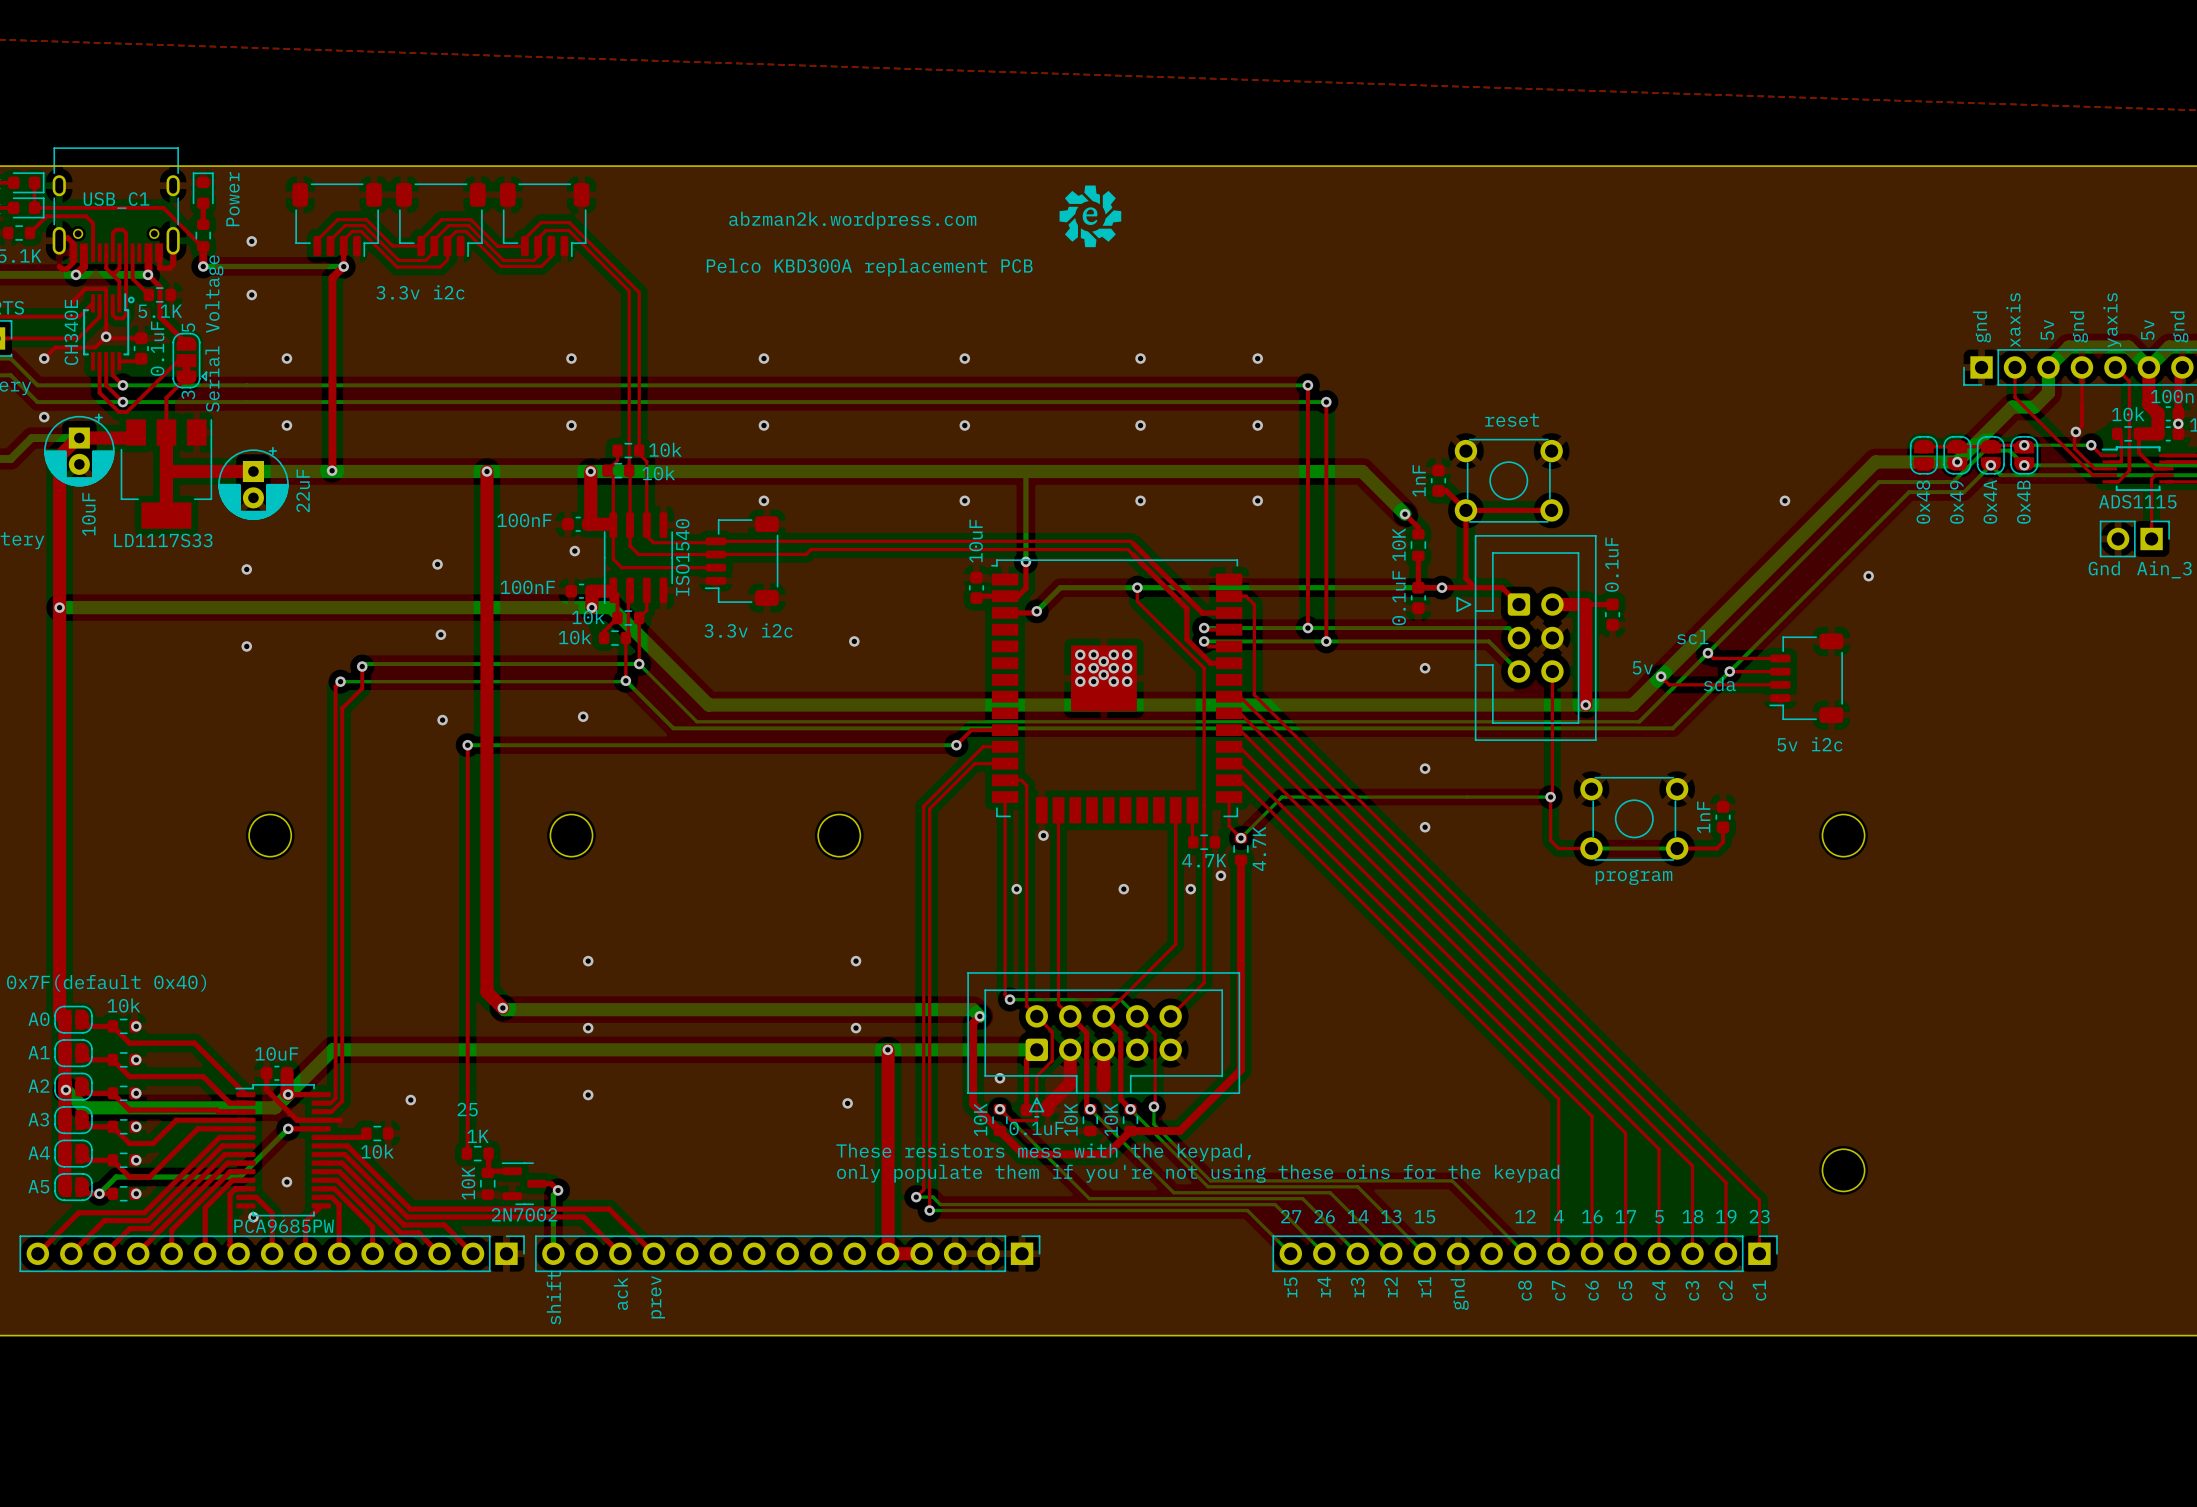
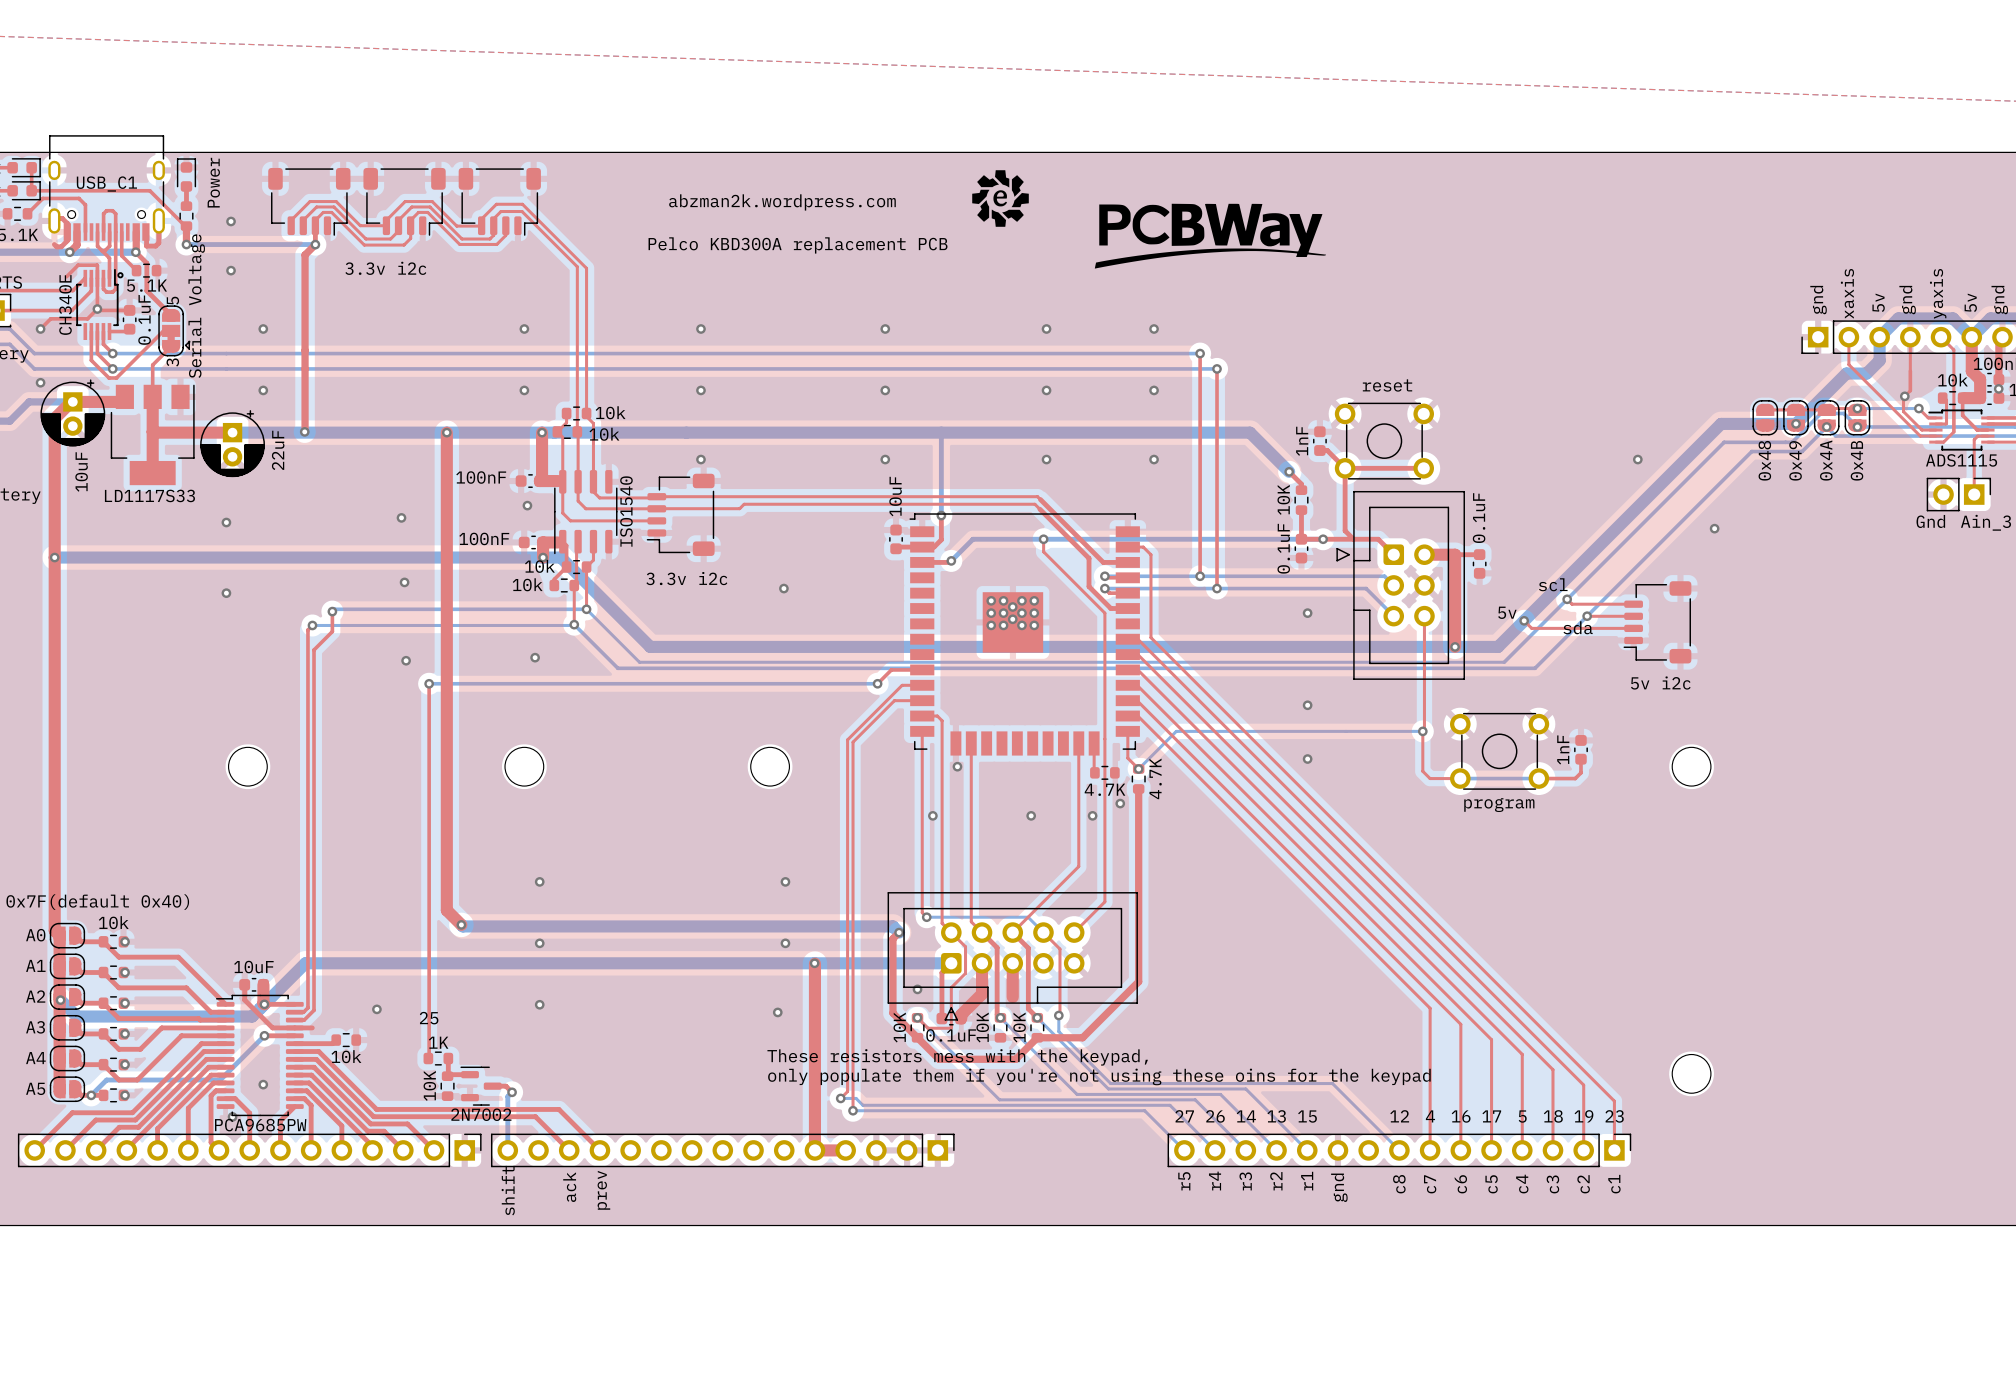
drawing: none -> [1094, 203, 1327, 269]

